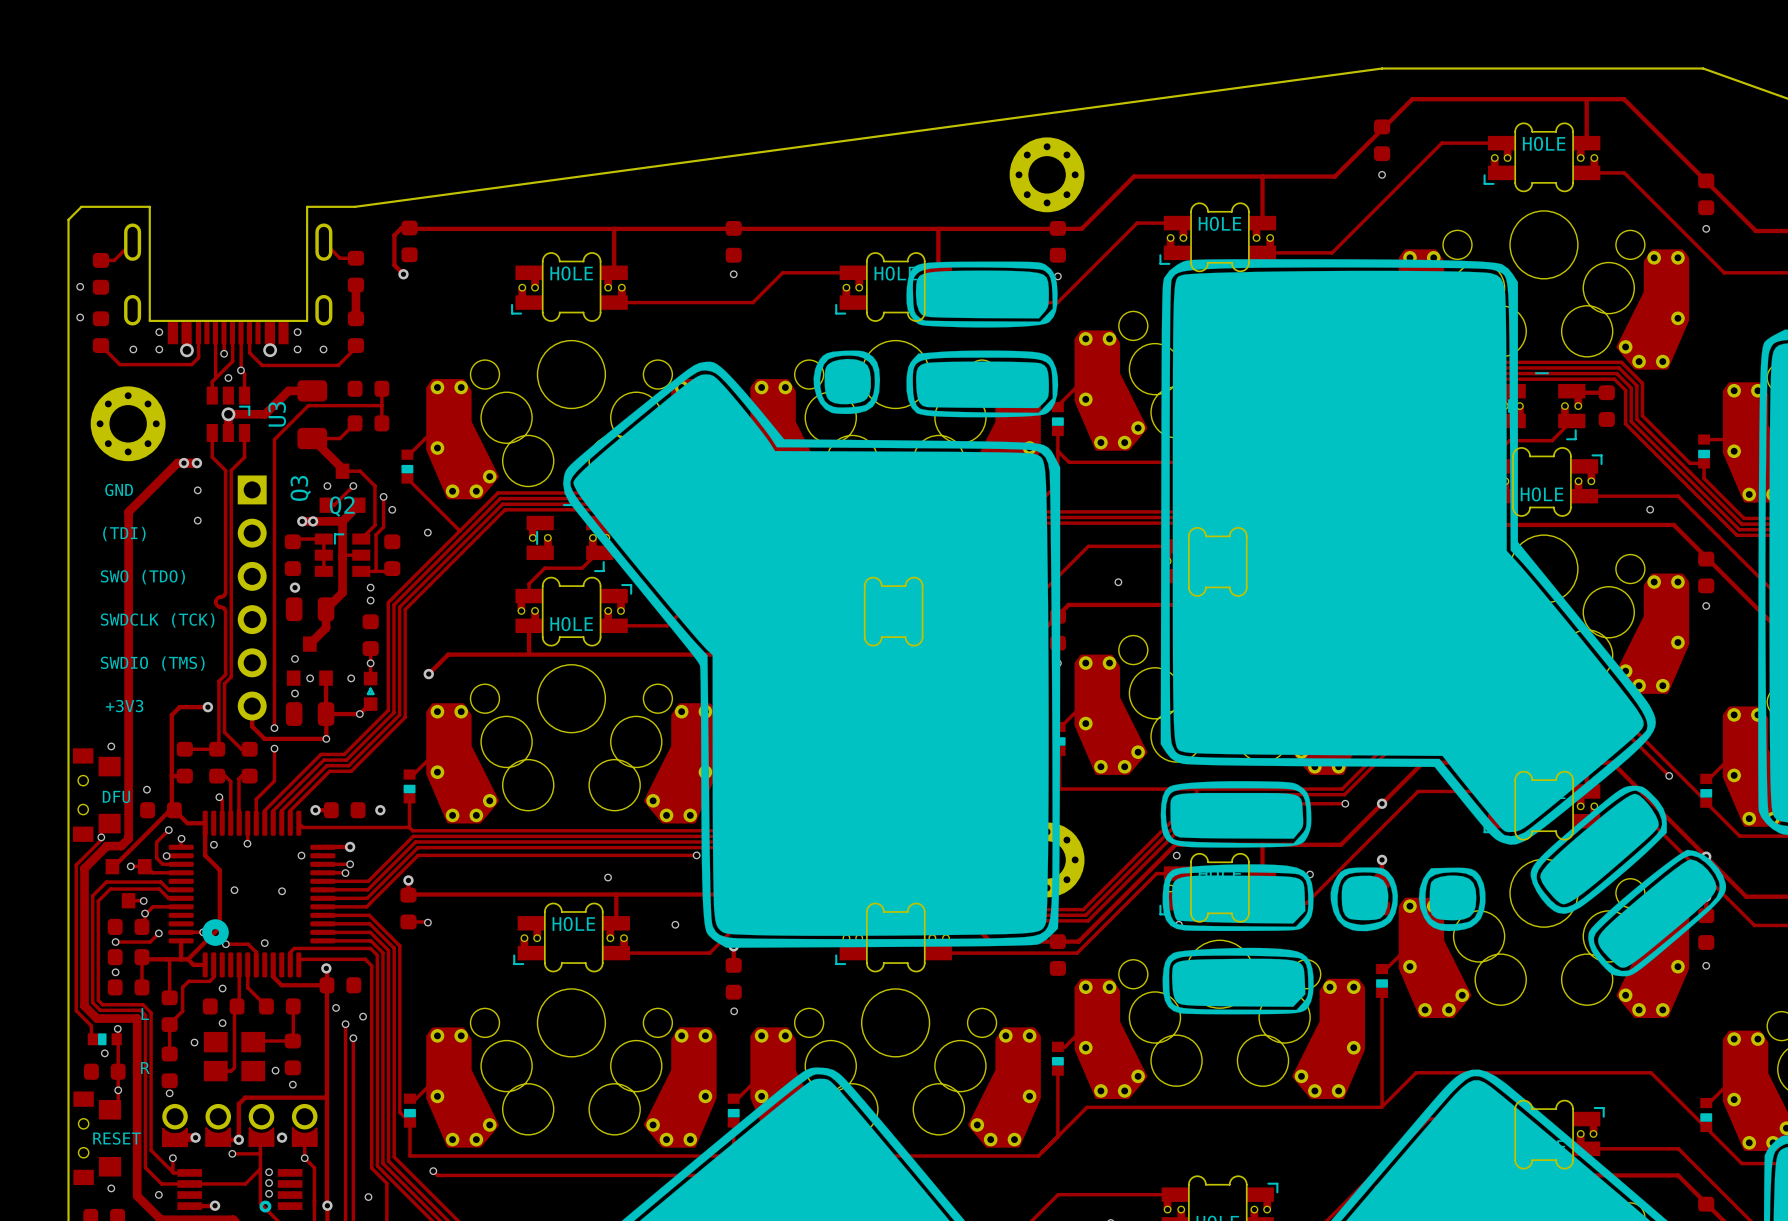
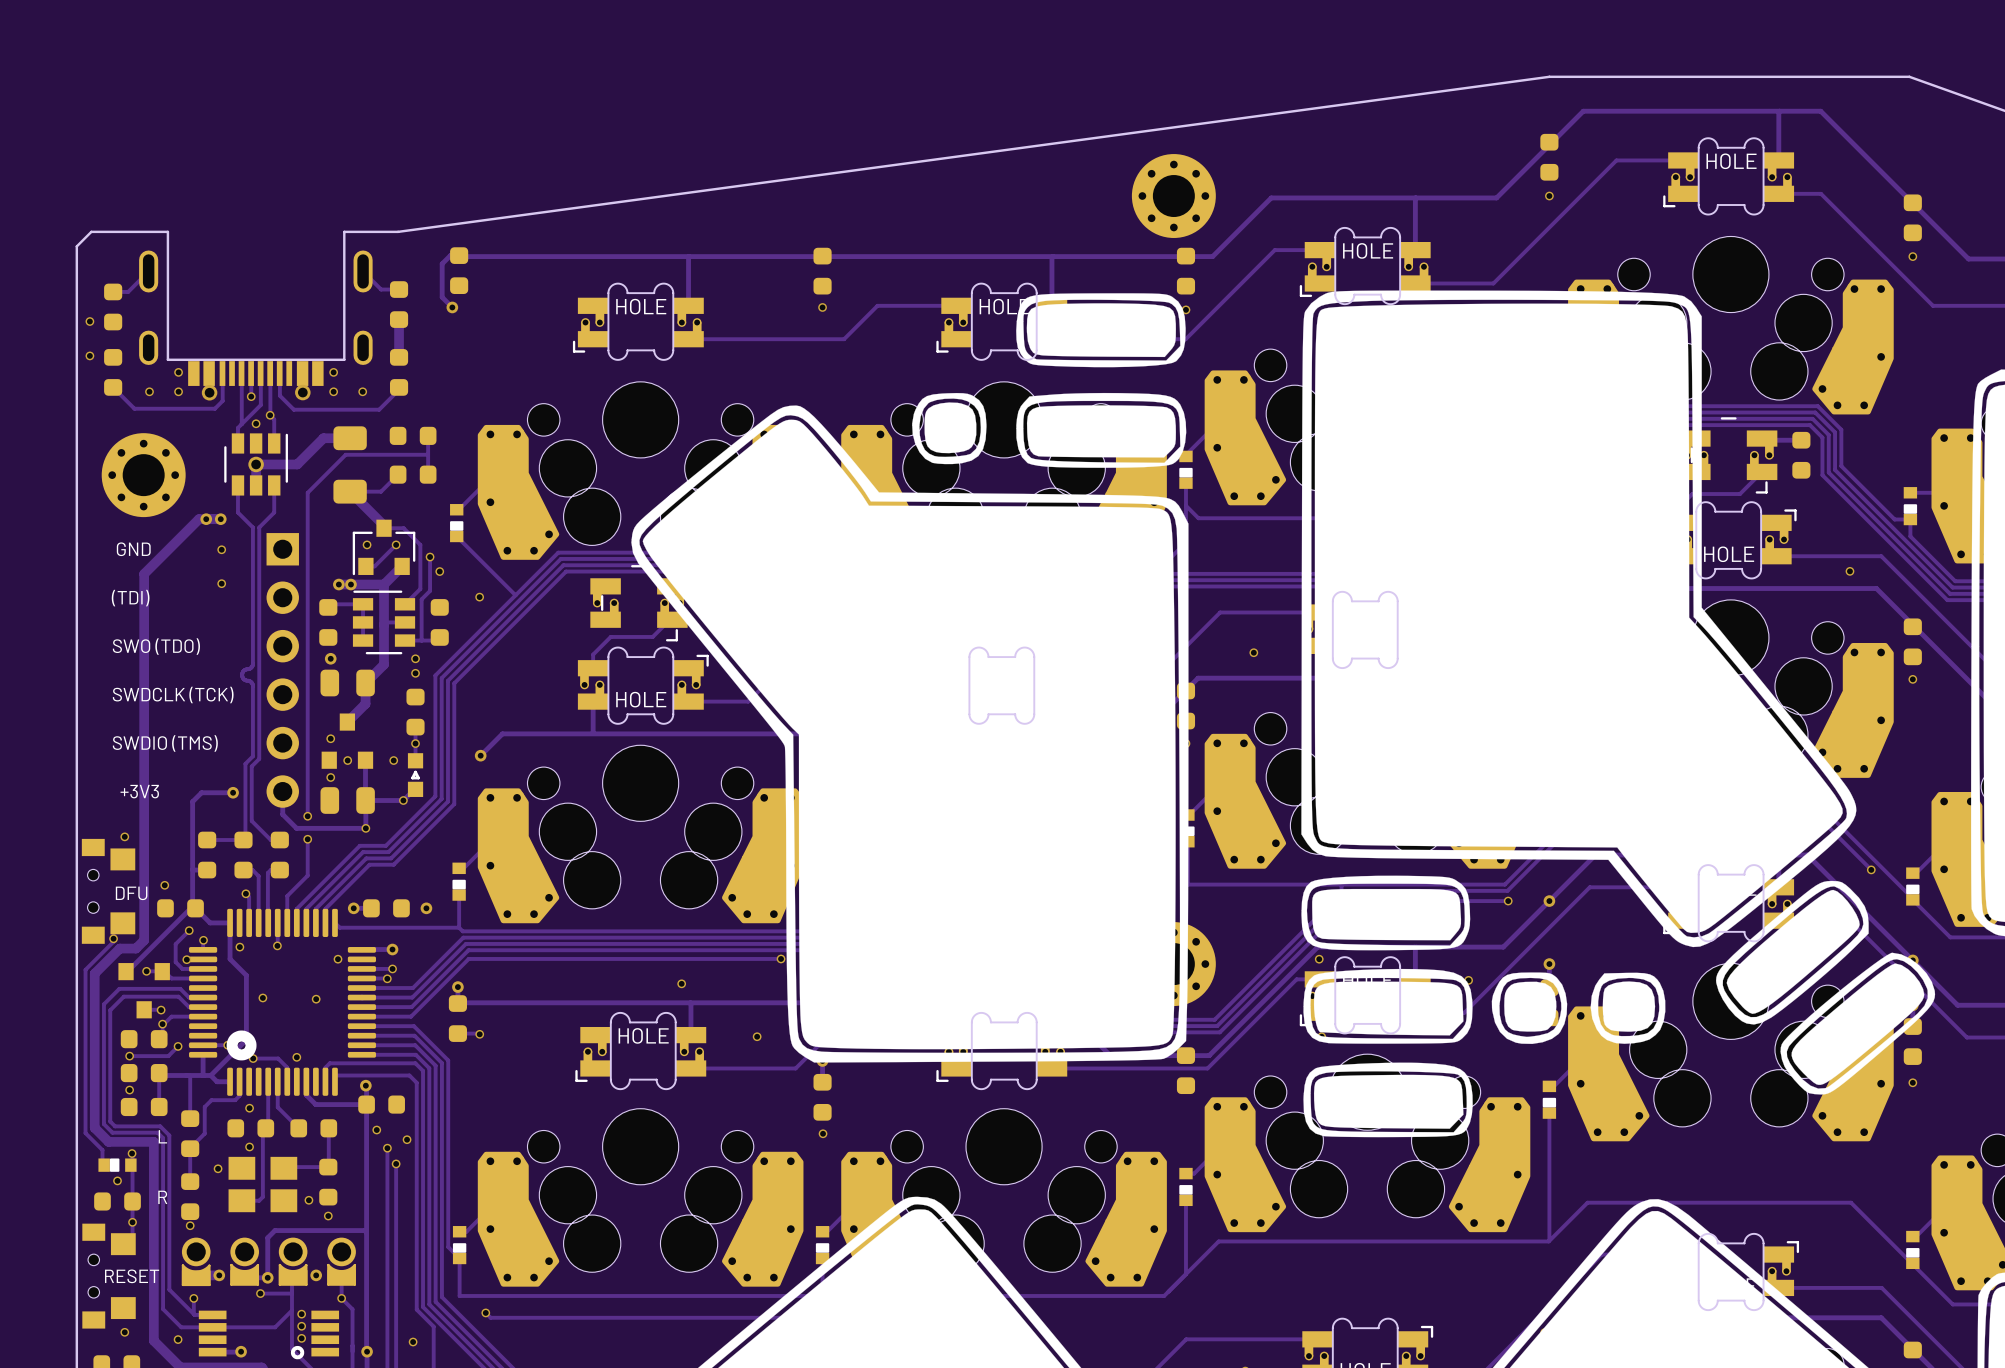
U3: (228, 414) -> none
part: none -> (256, 464)
Q3: (342, 488) -> none
part: none -> (384, 547)
Q2: (342, 555) -> none
part: none -> (384, 622)

